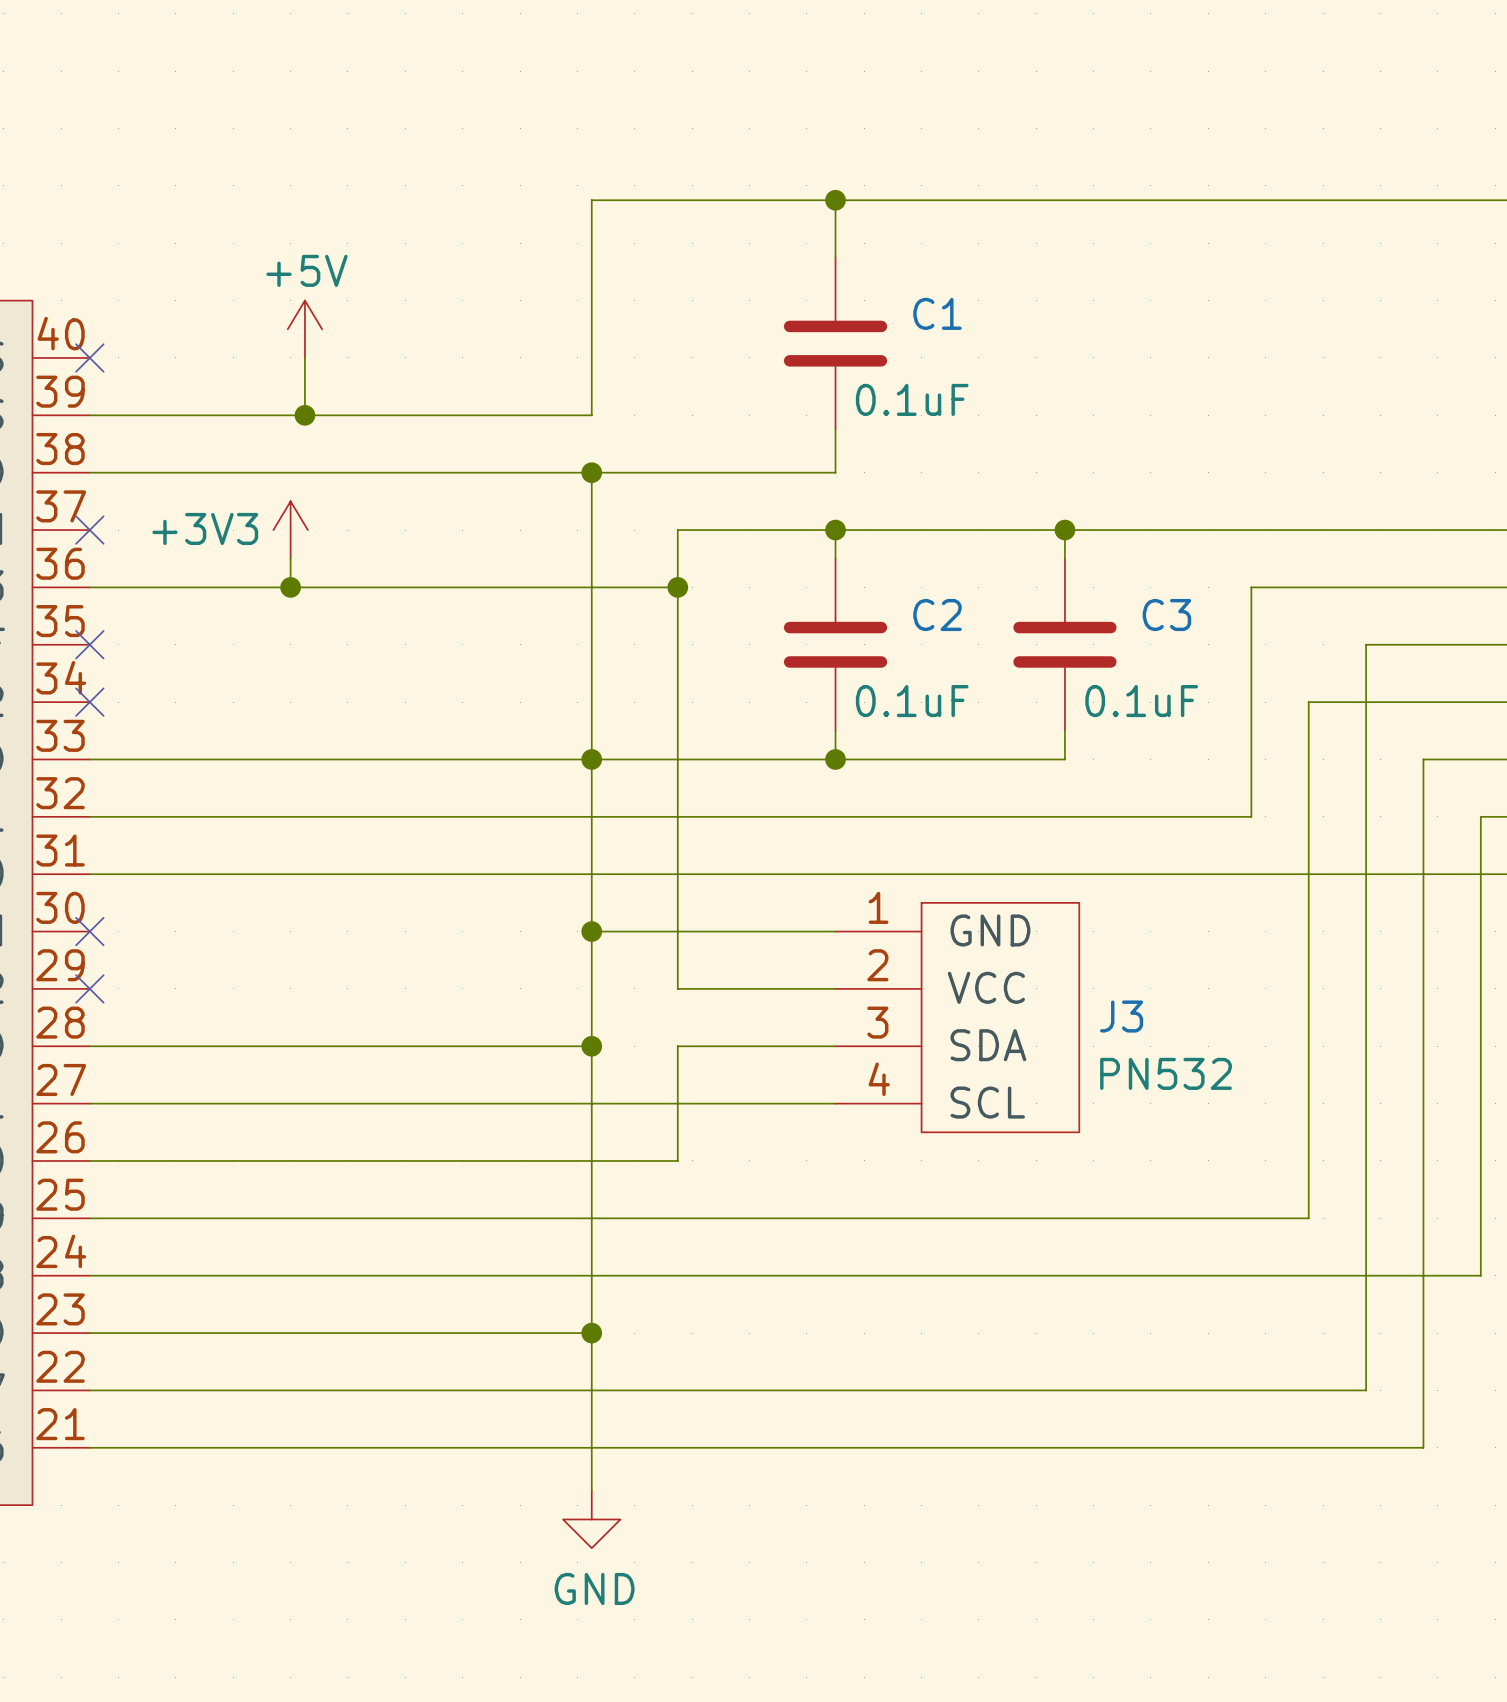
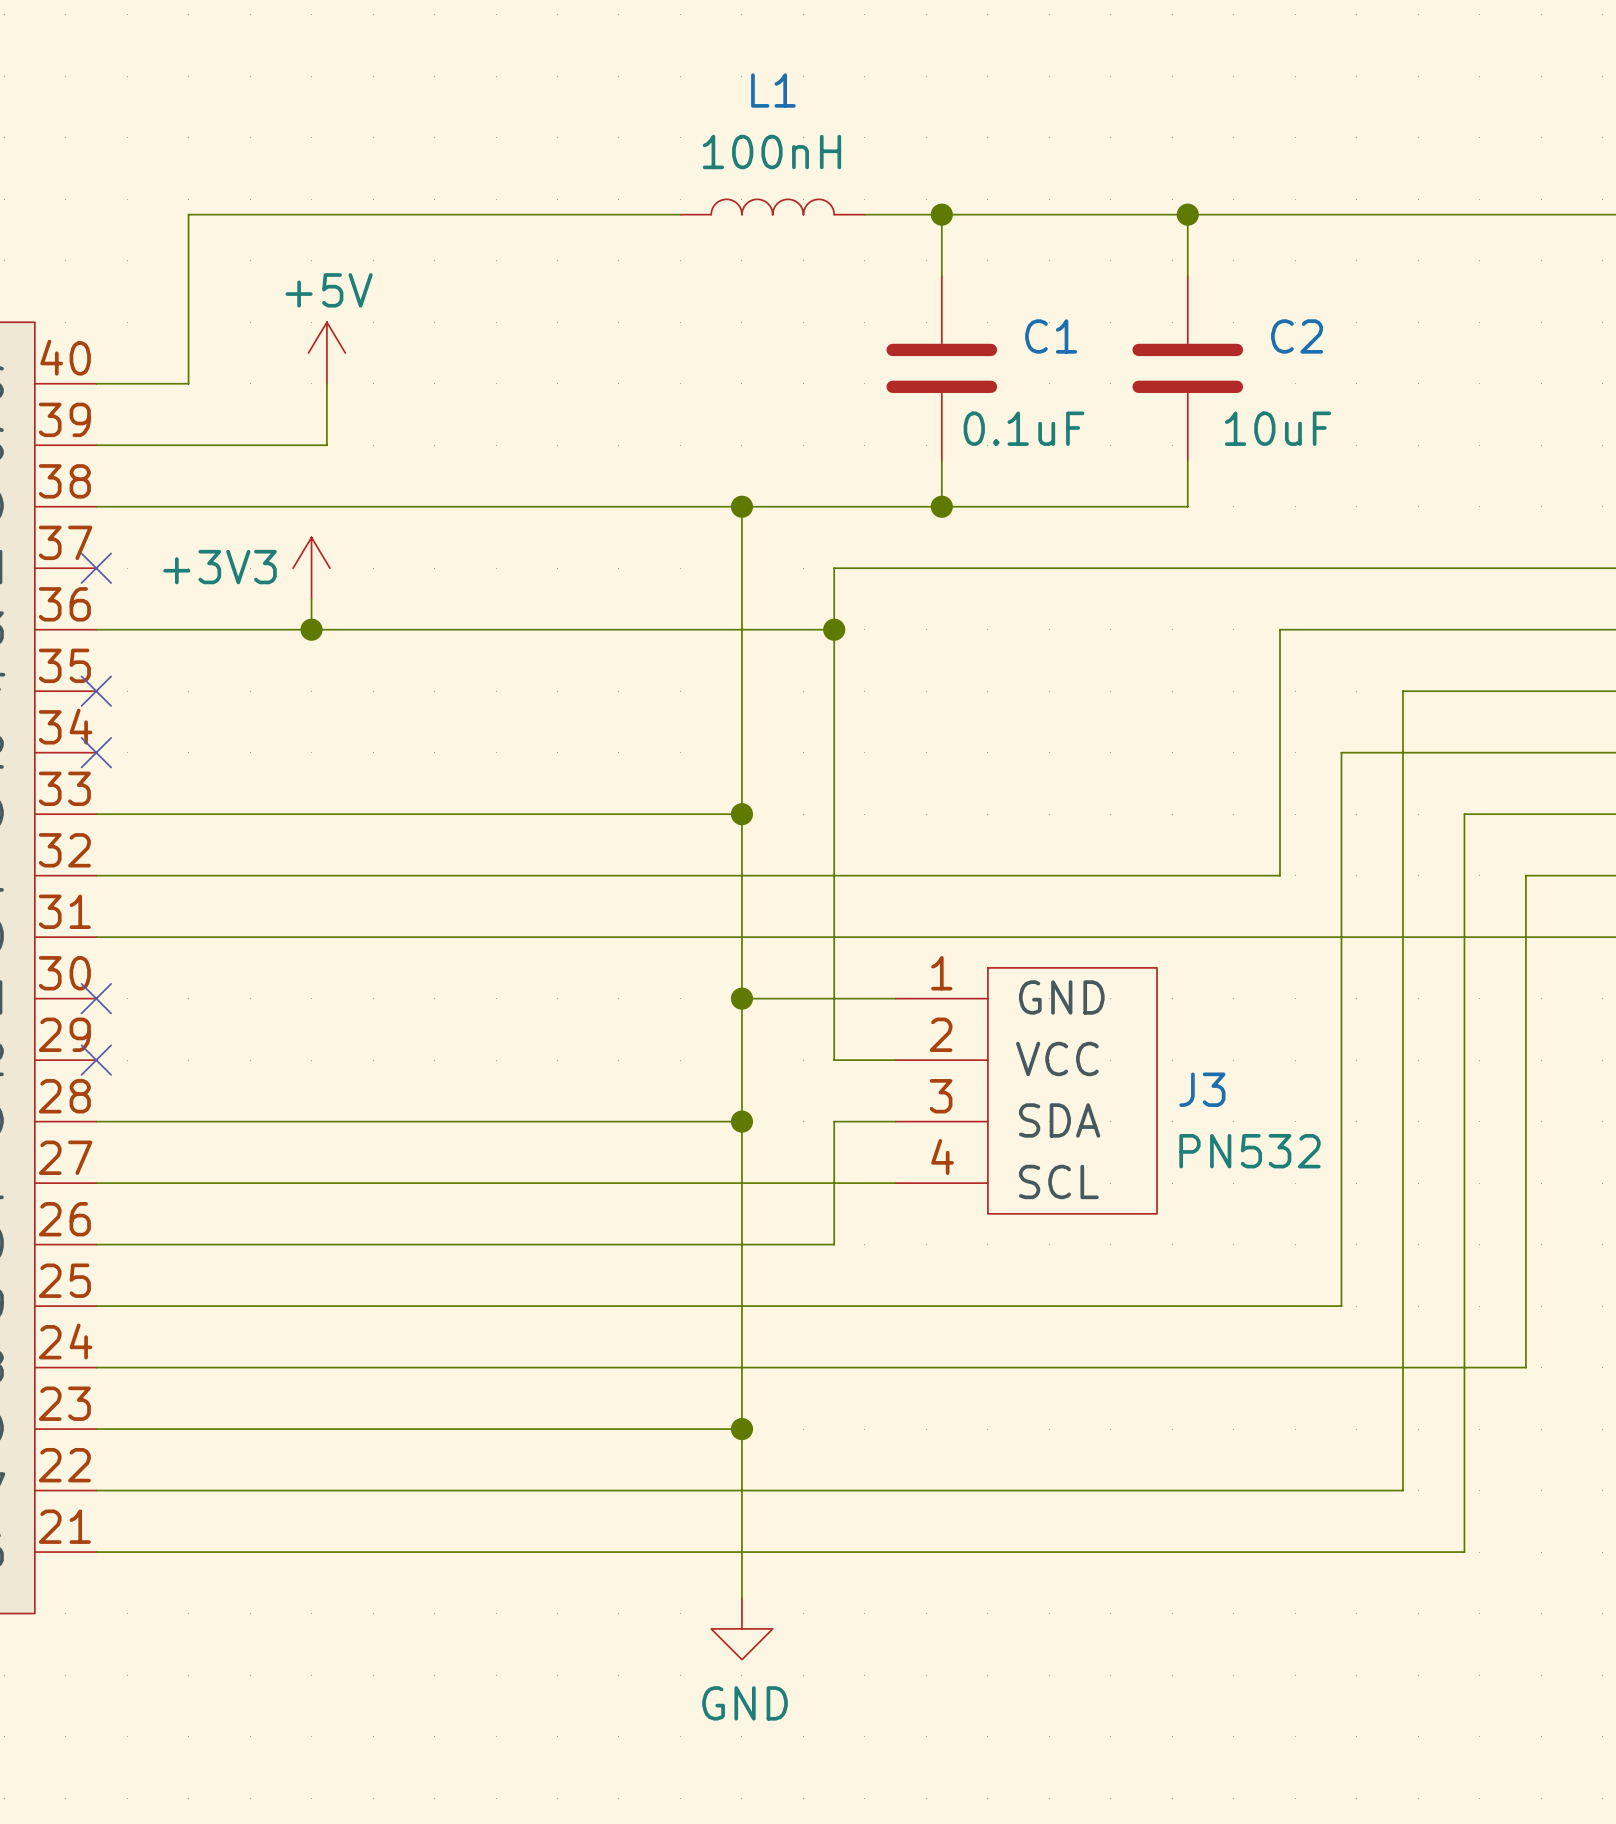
L1: none -> 100nH (772, 207)
wire: (591, 200) (591, 415) (304, 415) -> (634, 214) (188, 214) (188, 383) (96, 383)
wire: (634, 200) (806, 200) -> none
wire: (835, 200) (835, 257) -> (941, 214) (941, 276)
junction position: (835, 200) -> (941, 214)
wire: none -> (1187, 214) (1187, 276)
junction: none -> (1187, 214)
C1 position: (835, 343) -> (941, 368)
no-connect mark: (89, 357) -> none
junction: (304, 415) -> none
wire: (835, 429) (835, 472) -> (1187, 460) (1187, 506) (895, 506)
wire: none -> (941, 460) (941, 506)
wire: (591, 472) (591, 1490) -> (741, 506) (741, 1598)
junction: (591, 472) -> none
junction: none -> (741, 506)
junction: none -> (941, 506)
wire: (778, 530) (677, 530) (677, 988) (778, 988) -> (834, 568) (834, 1060)
wire: (835, 530) (835, 558) -> none
junction: (835, 530) -> none
wire: (1064, 530) (1064, 558) -> none
junction: (1064, 530) -> none
junction: (677, 587) -> none
junction: none -> (834, 629)
wire: (1251, 587) (1251, 702) -> (1464, 691) (1402, 691) (1402, 752) (1341, 752)
C2 position: (835, 644) -> (1187, 368)
C3: 0.1uF (1064, 644) -> none
wire: (1366, 644) (1366, 759) -> (1525, 814) (1464, 814)
C2 value: 0.1uF (912, 701) -> 10uF (1278, 428)
wire: (835, 730) (835, 759) -> none
wire: (1064, 730) (1064, 759) (692, 759) -> none
junction: (591, 759) -> none
junction: none -> (741, 814)
junction: (835, 759) -> none
wire: (1423, 759) (1423, 816) -> (1587, 875) (1525, 875)
wire: (1194, 816) (1251, 816) -> (1279, 875) (1279, 629) (1341, 629)
wire: none -> (1341, 875) (1341, 1306)
wire: (1480, 816) (1480, 1275) (1423, 1275) (1423, 1447) (1366, 1447) -> none
wire: (591, 931) (692, 931) -> (726, 629) (834, 629)
junction: (591, 931) -> none
junction: none -> (741, 998)
junction: (591, 1046) -> none
wire: (677, 1046) (677, 1160) -> (834, 1121) (834, 1244) (726, 1244)
wire: (692, 1046) (778, 1046) -> (634, 1121) (726, 1121)
junction: none -> (741, 1121)
wire: (1251, 1218) (1308, 1218) -> (1402, 1490) (1402, 1306)
wire: none -> (634, 1429) (741, 1429)
junction position: (591, 1333) -> (741, 1429)
wire: (1308, 1390) (1366, 1390) -> (1464, 1552) (1464, 1490)
power symbol position: GND (591, 1519) -> GND (741, 1628)

